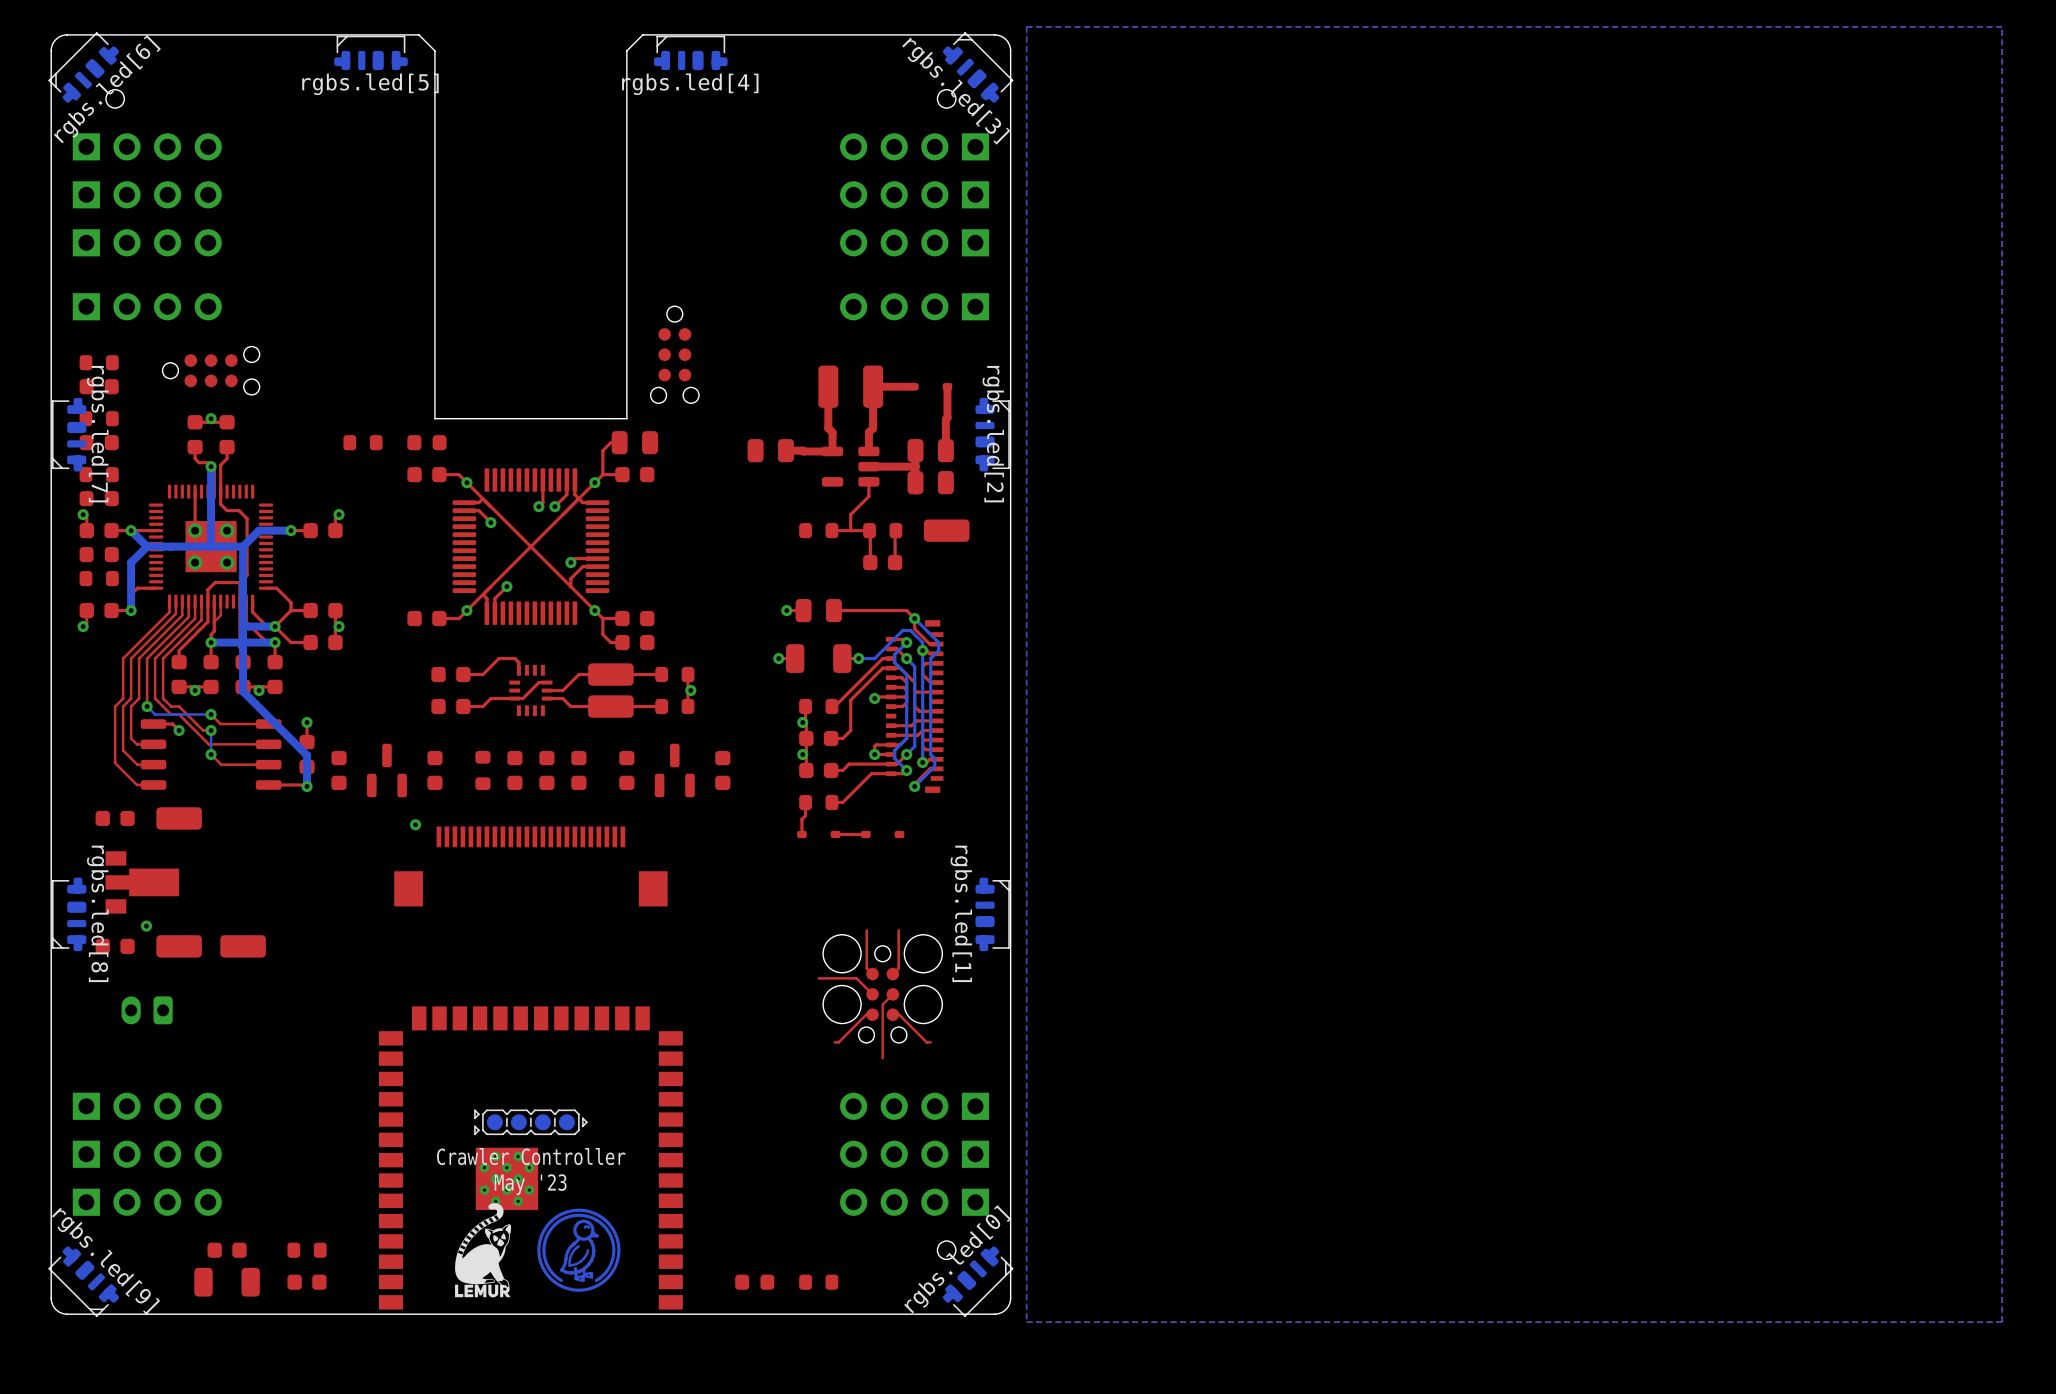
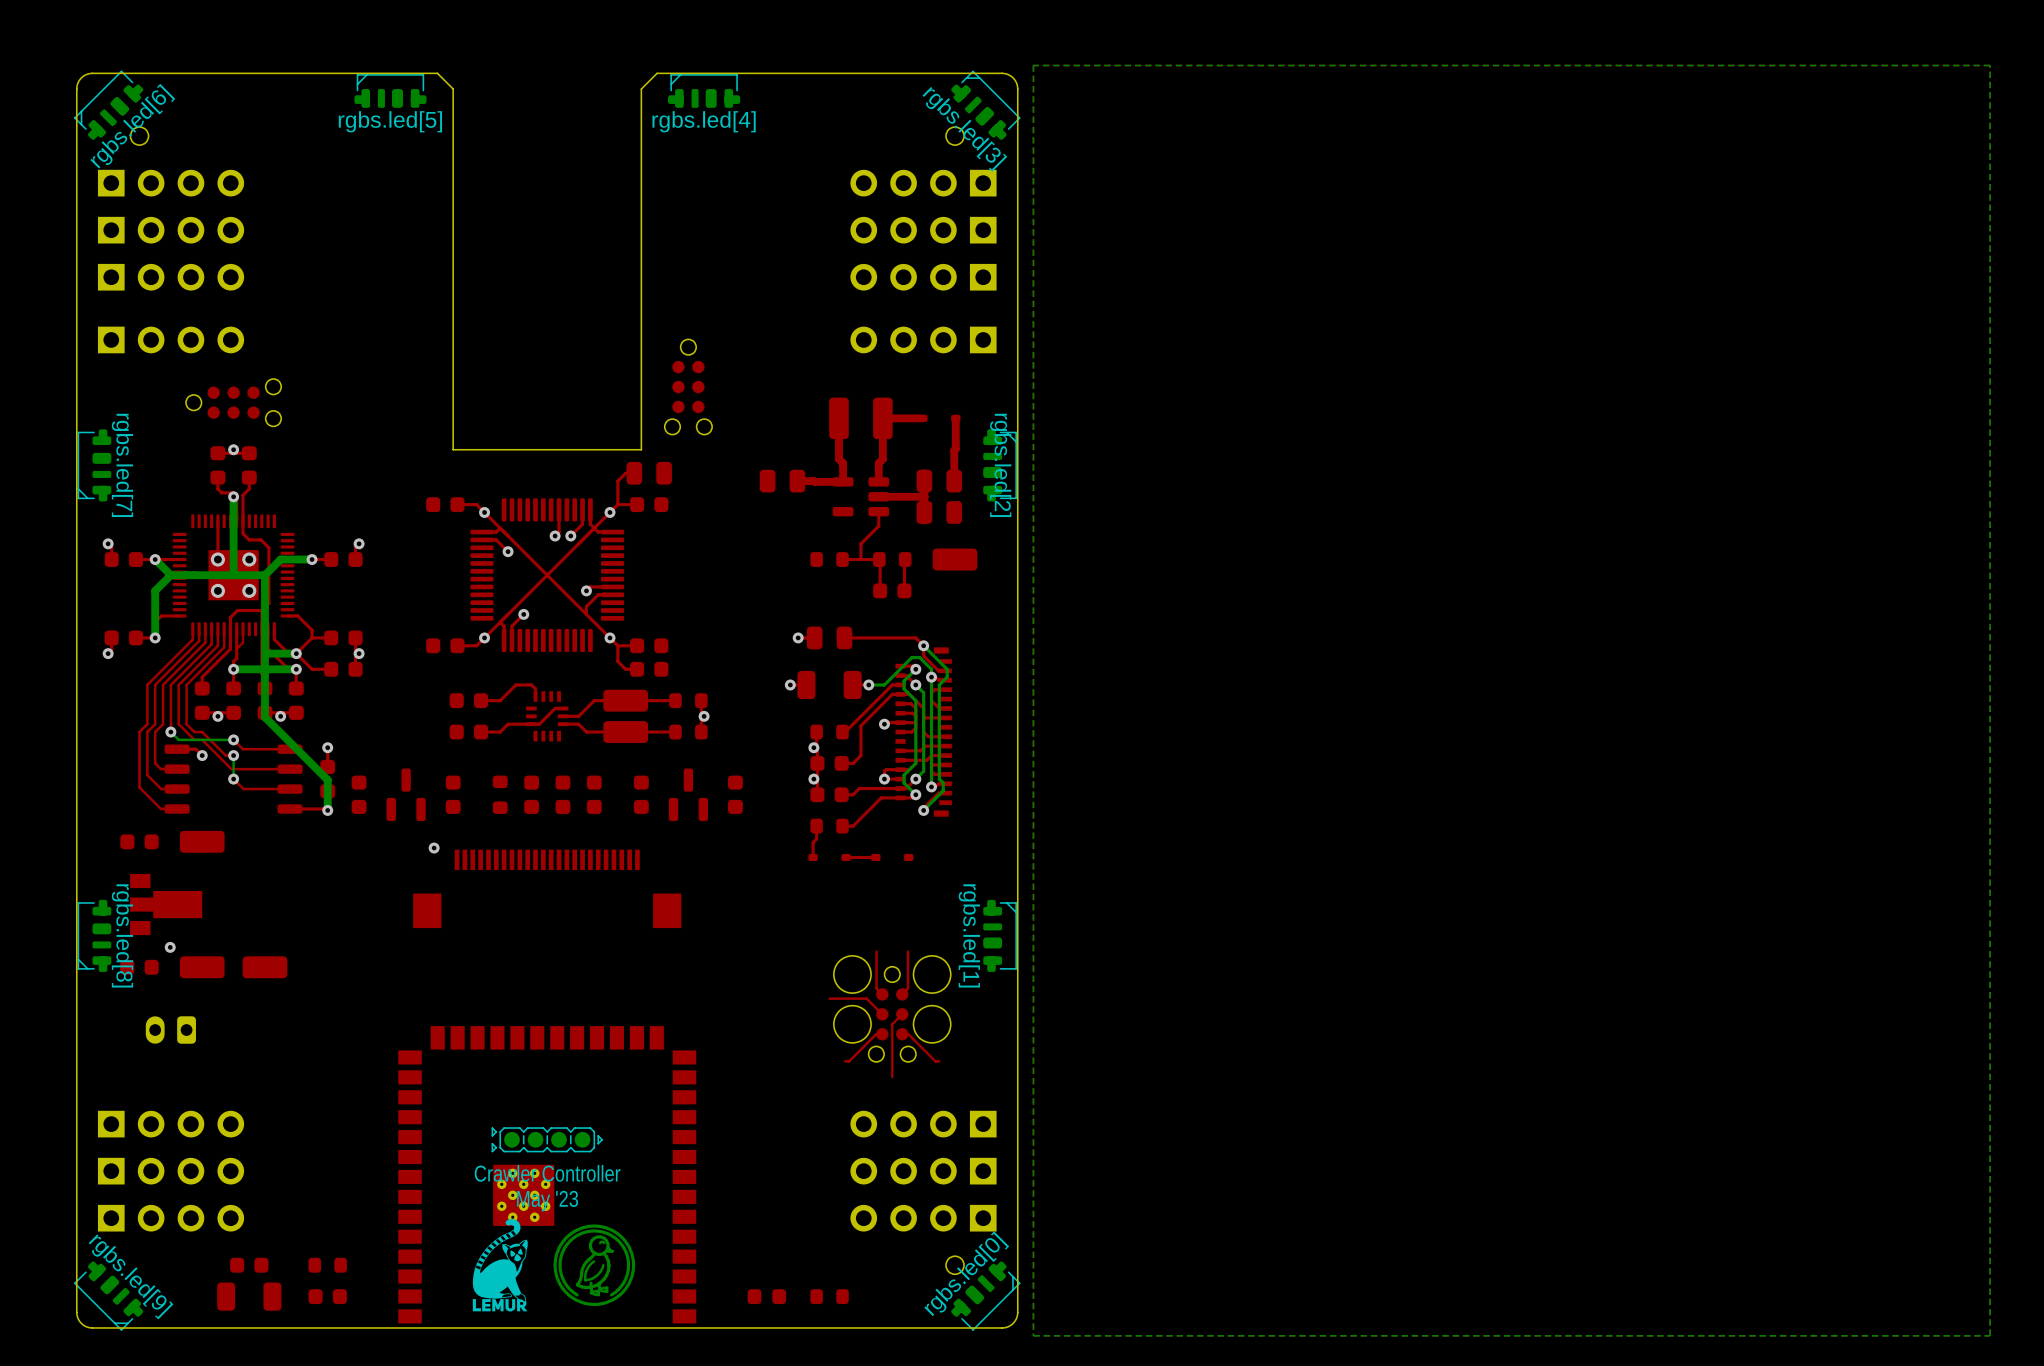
part: (99, 362) -> none
part: (99, 386) -> none
part: (99, 418) -> none
part: (99, 442) -> none
part: (363, 442) -> none
part: (426, 442) -> none
part: (99, 474) -> none
part: (99, 498) -> none
part: (99, 554) -> none
part: (99, 578) -> none

